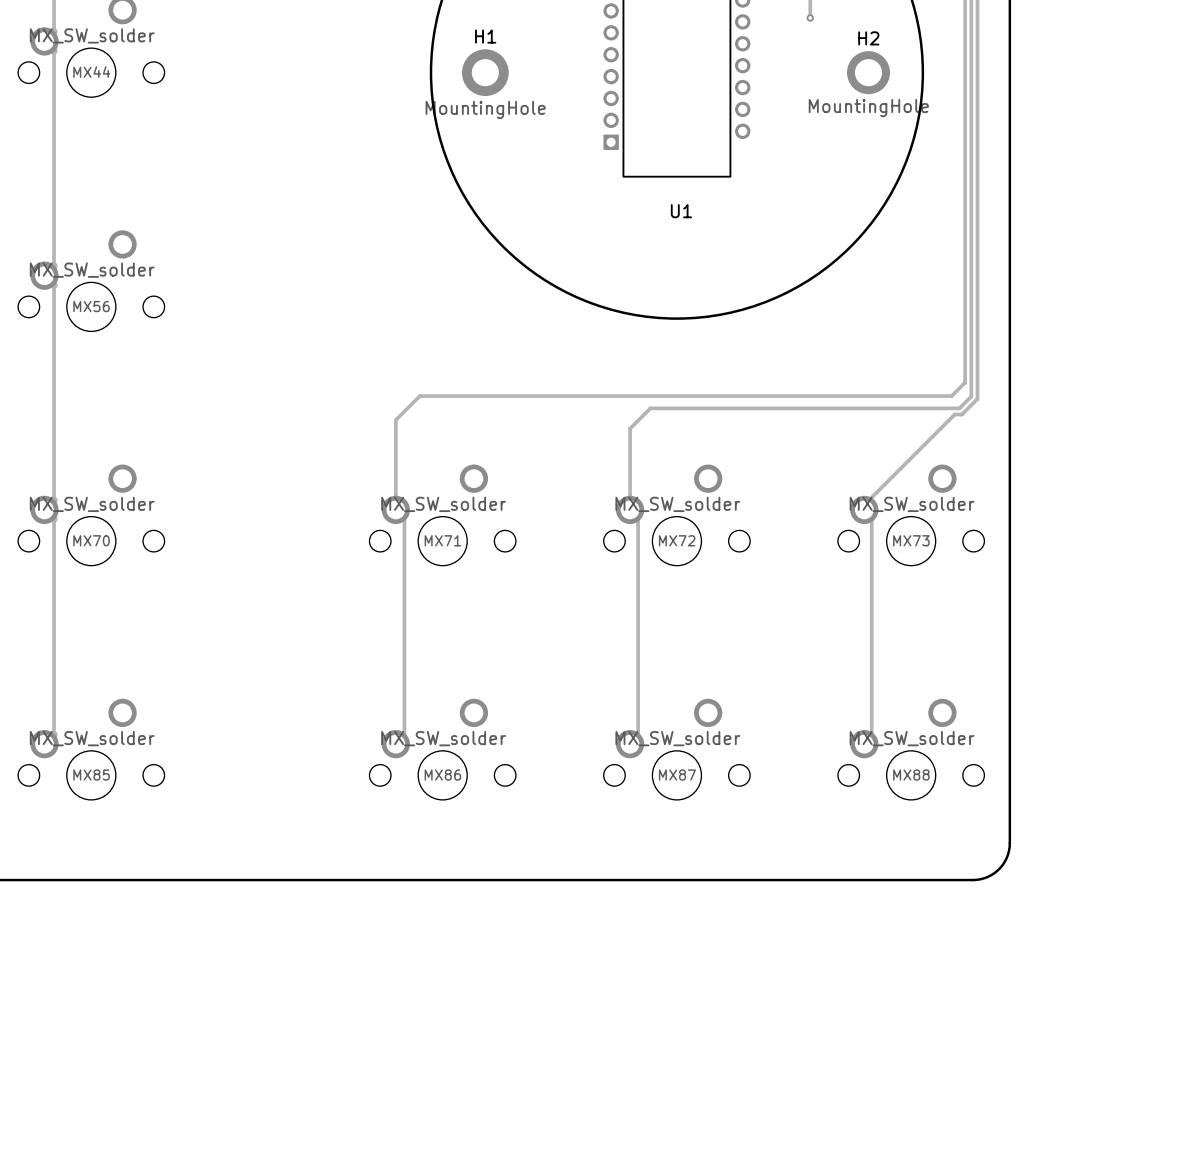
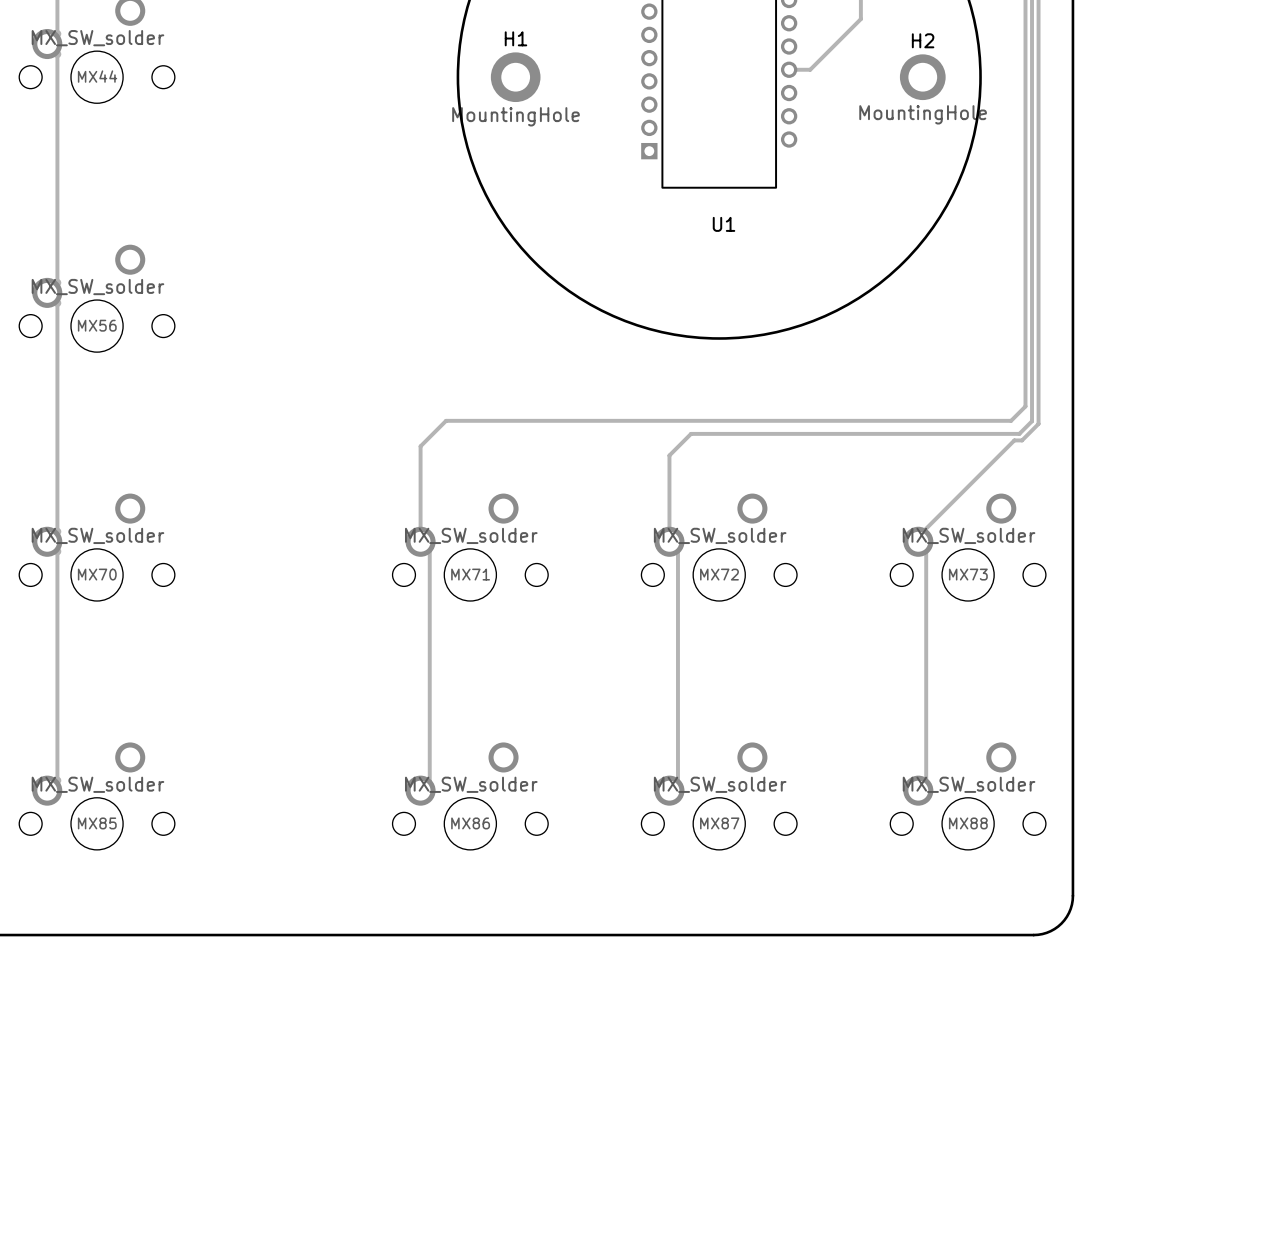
track: none -> (860, 19) (810, 69) (789, 69)
via: (810, 17) -> none

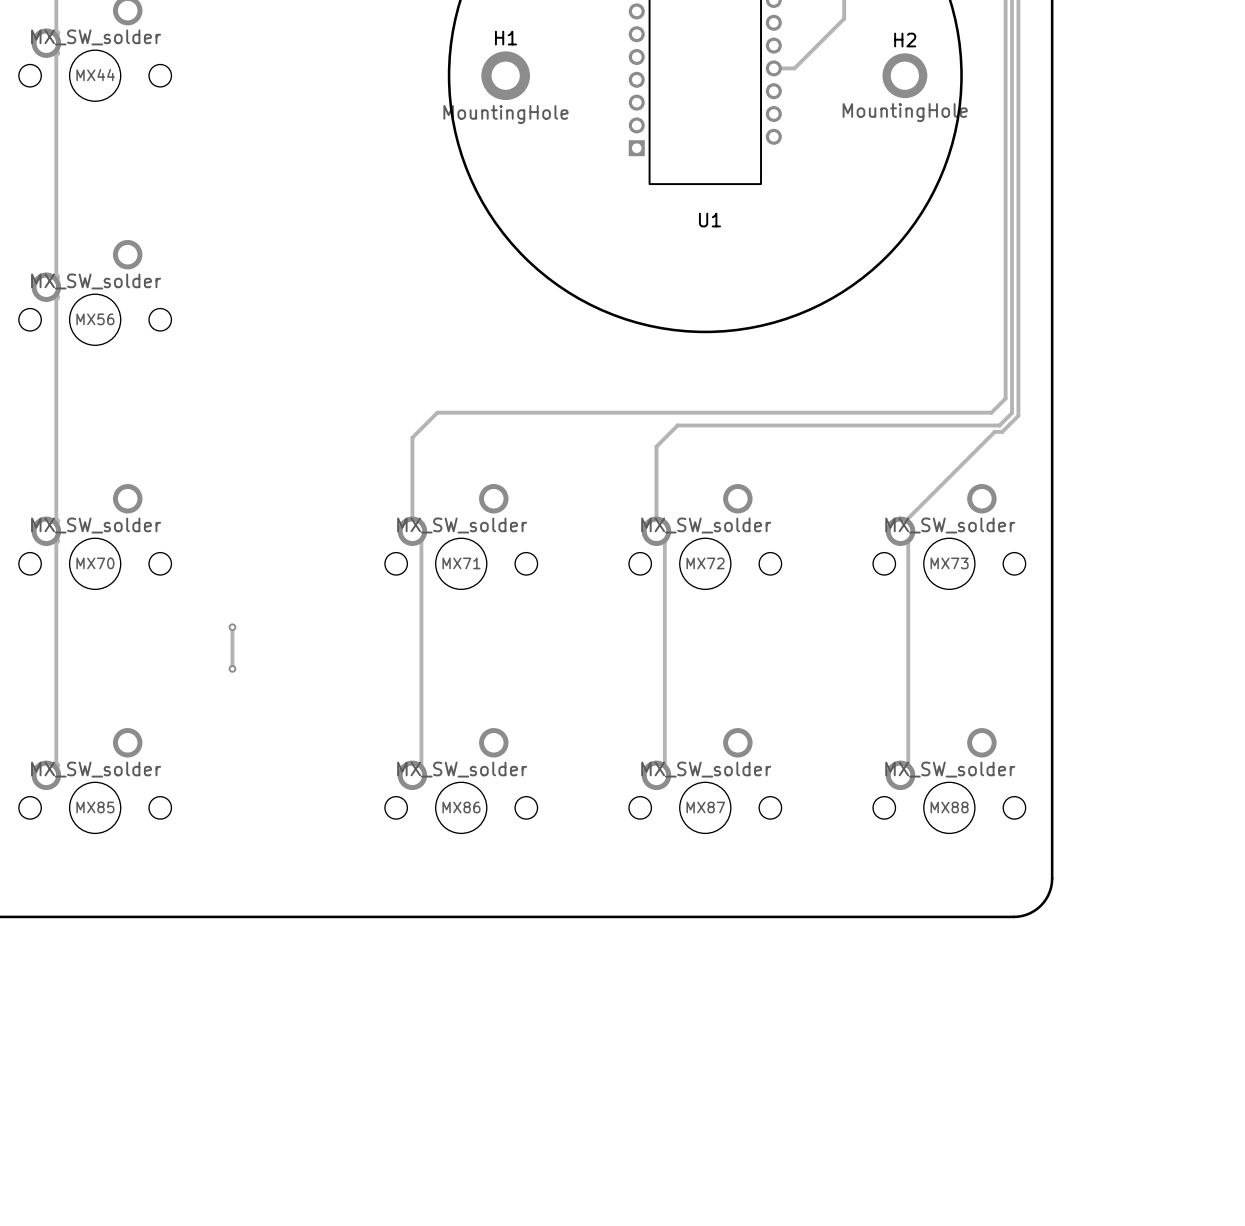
track: none -> (232, 627) (232, 668)
via: none -> (232, 627)
via: none -> (232, 668)

